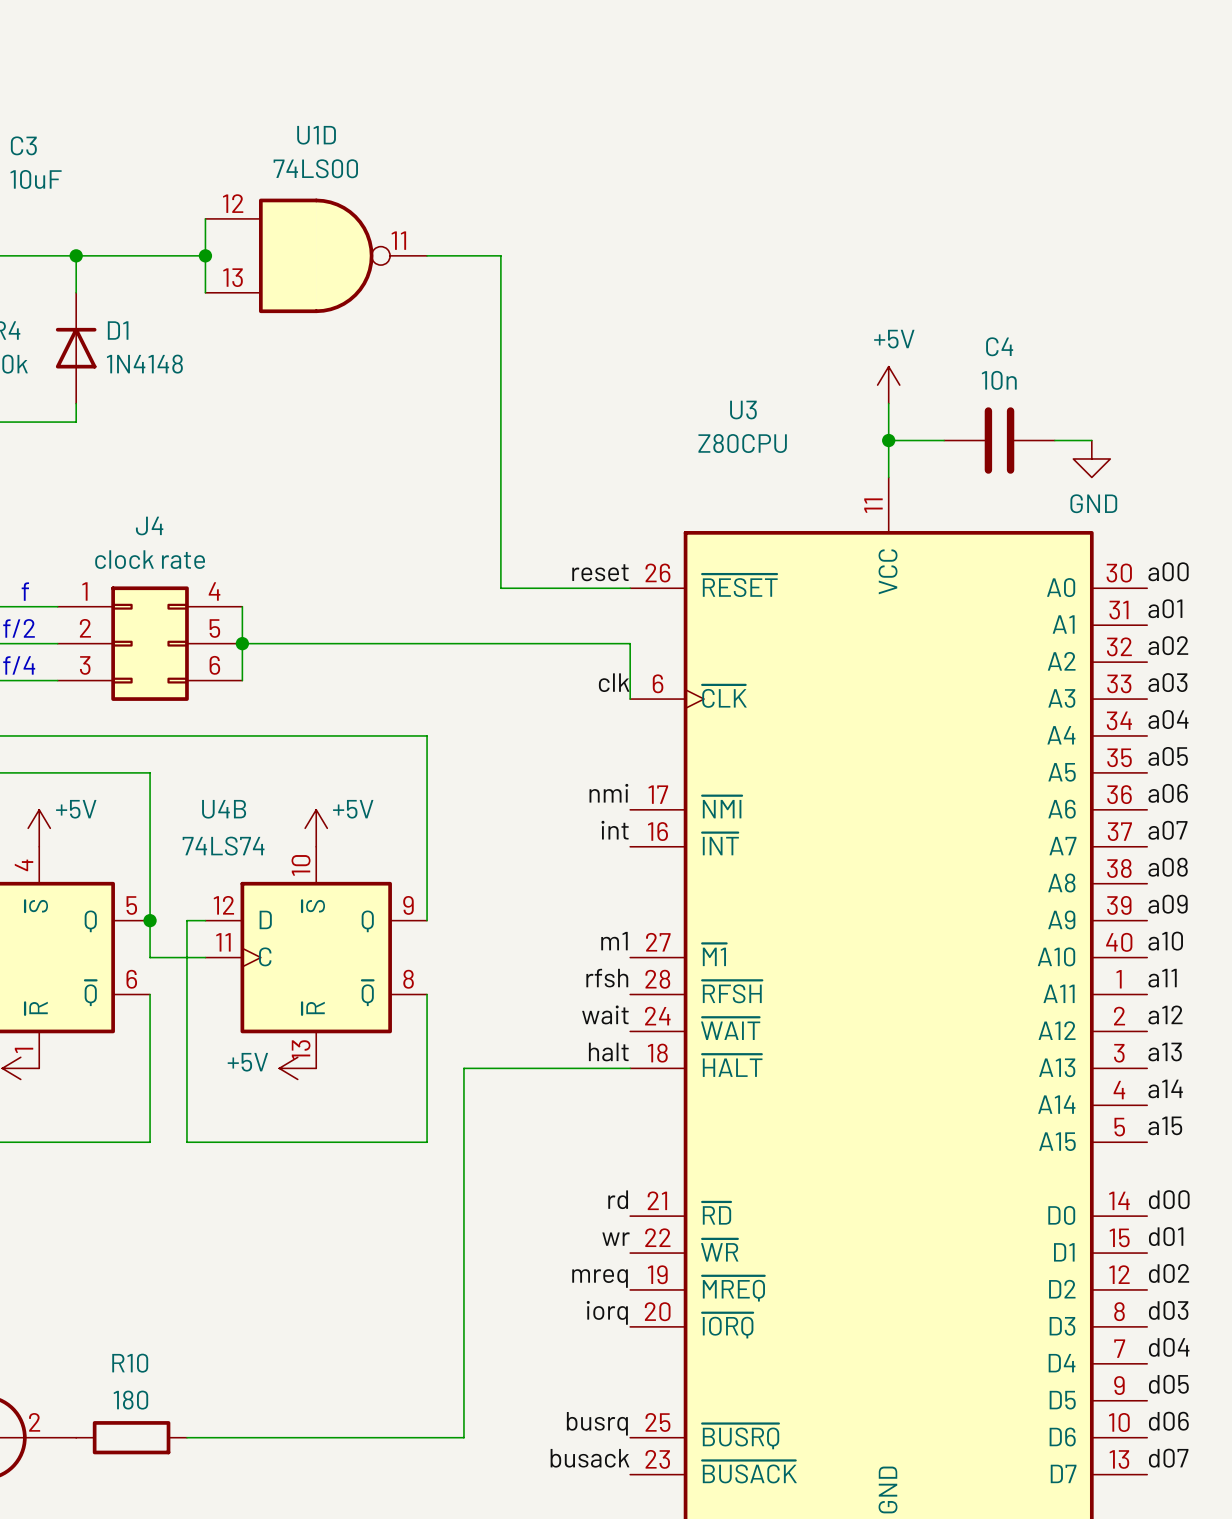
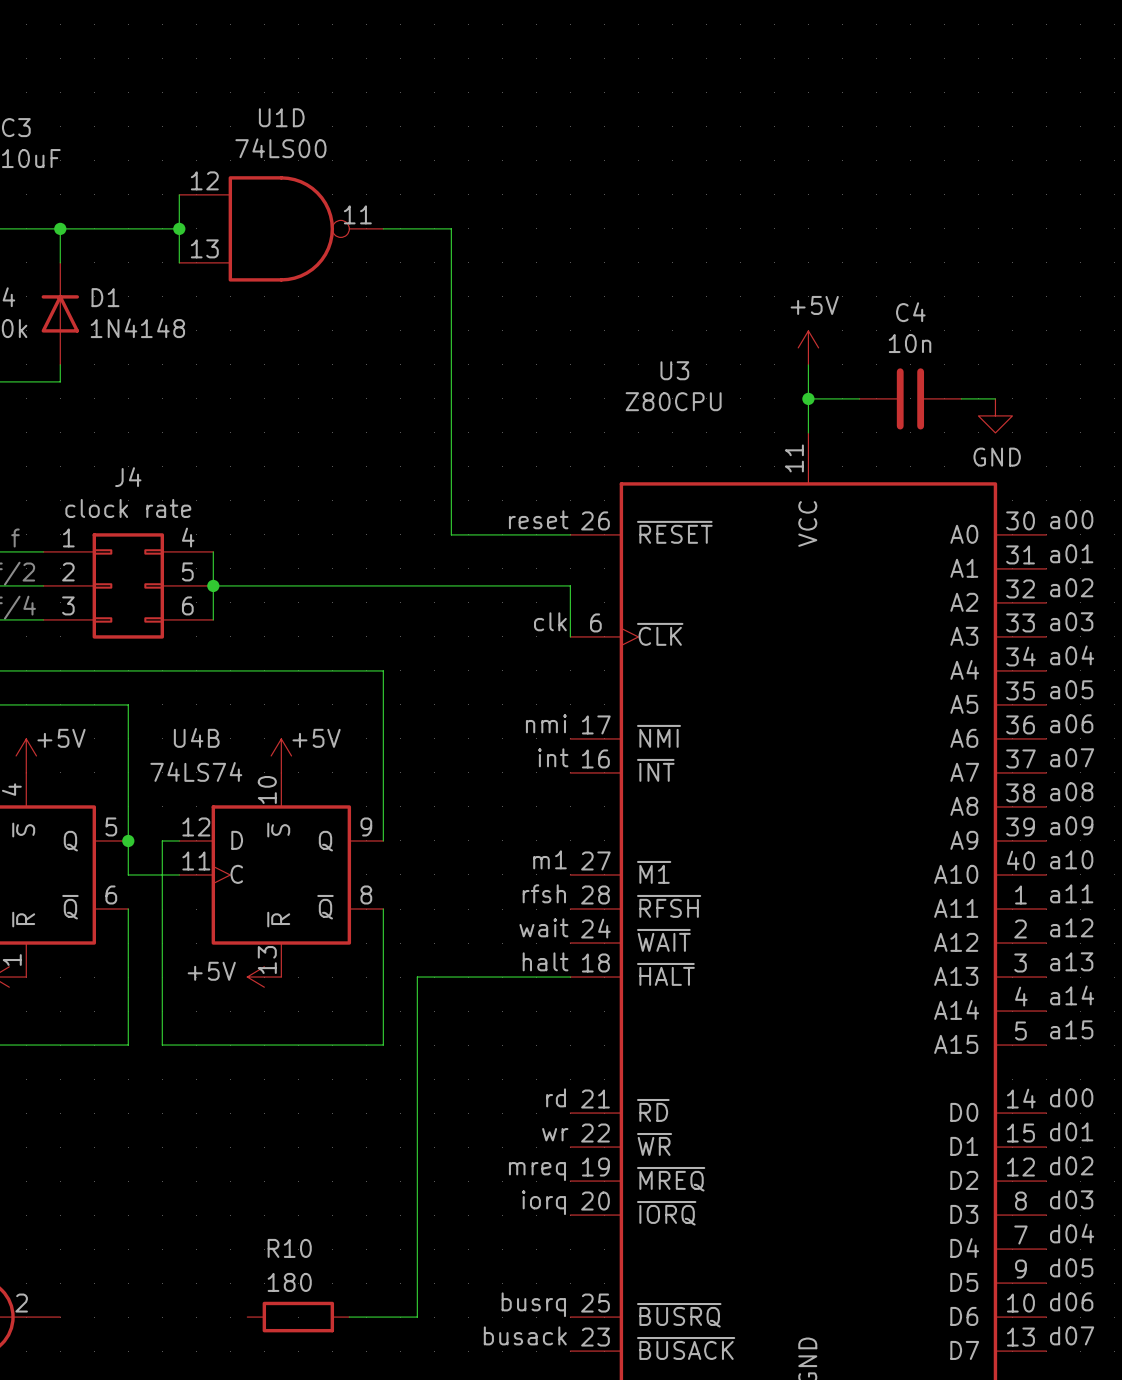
R10 position: (131, 1437) -> (298, 1317)
wire: (186, 1437) (390, 1437) -> none

